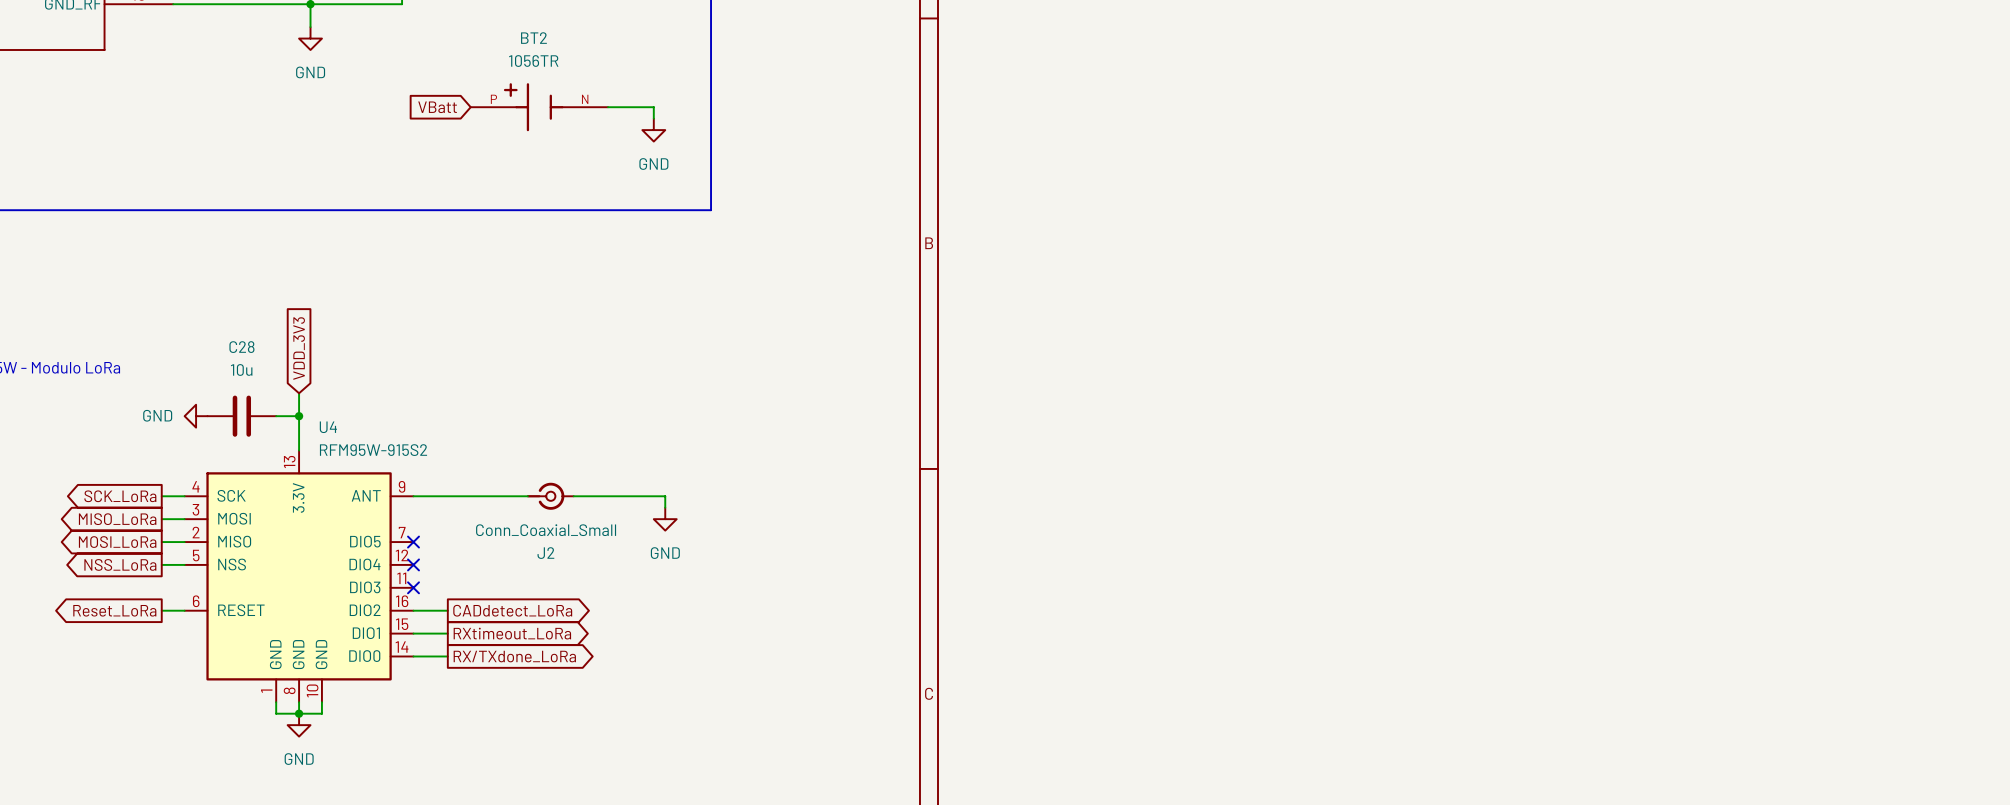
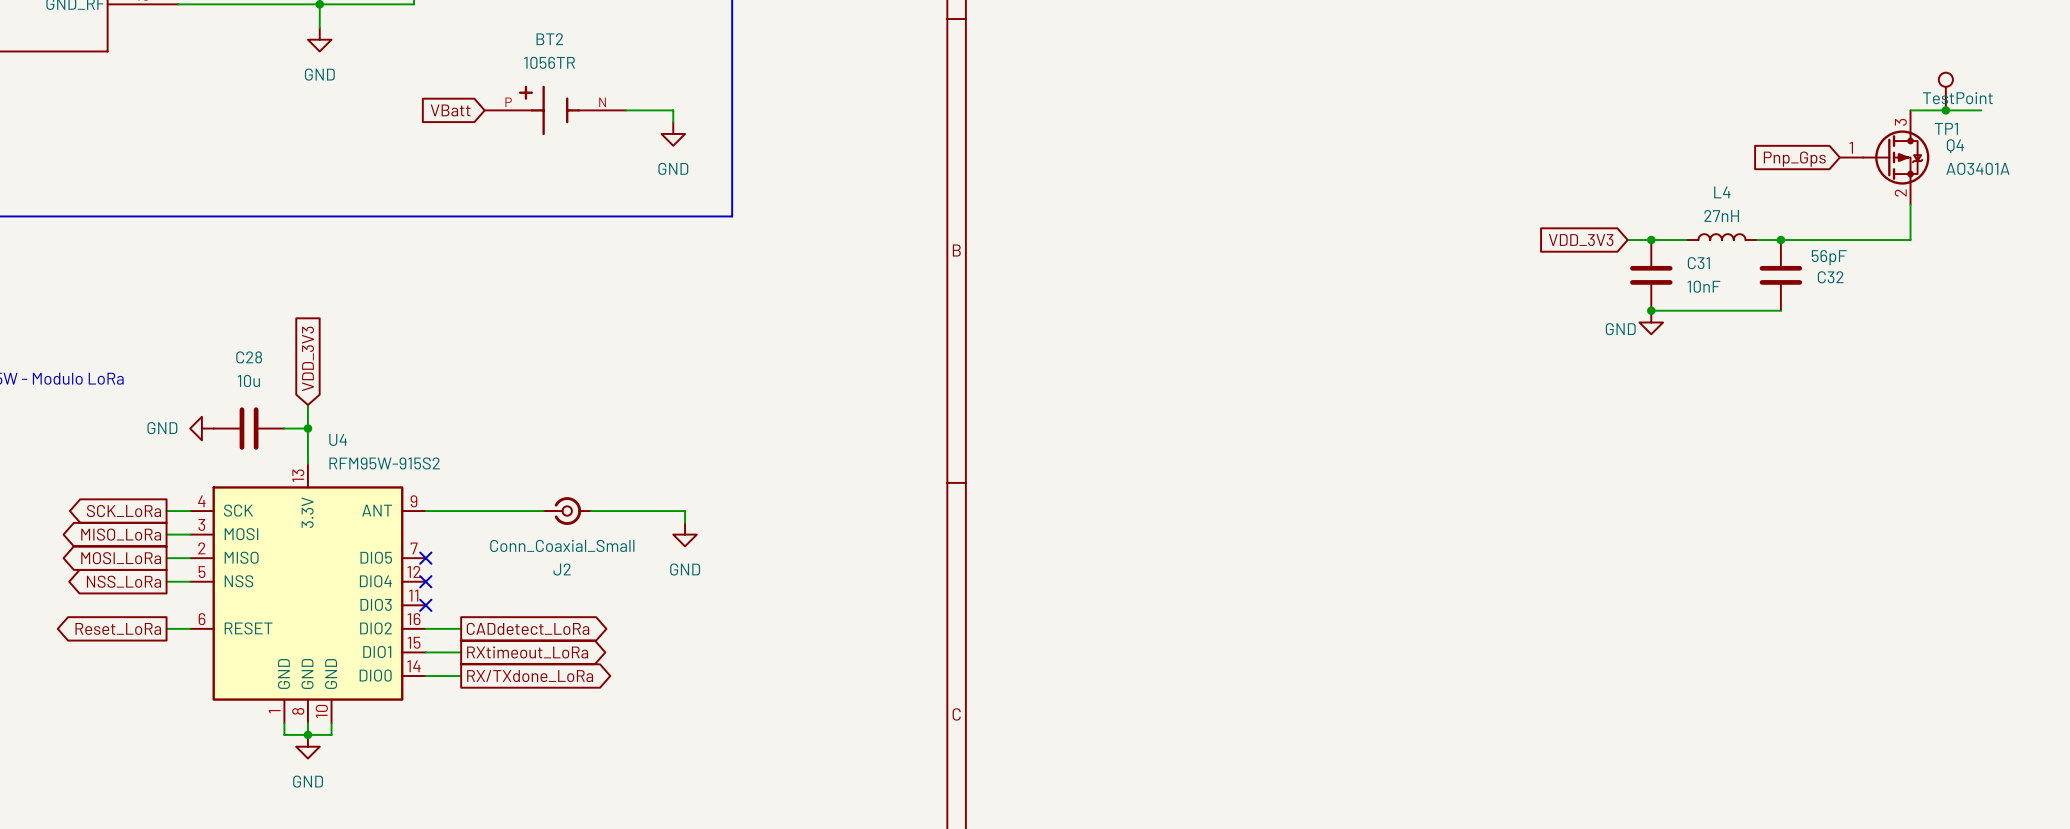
TP1: none -> TestPoint (1945, 91)
wire: none -> (1910, 110) (1981, 110)
junction: none -> (1945, 110)
Q4: none -> AO3401A (1884, 157)
global label: none -> Pnp_Gps (1794, 159)
wire: none -> (1910, 204) (1910, 240) (1757, 240)
L4: none -> 27nH (1721, 237)
global label: none -> VDD_3V3 (1581, 240)
wire: none -> (1627, 240) (1686, 240)
junction: none -> (1651, 240)
junction: none -> (1780, 240)
C31: none -> 10nF (1651, 275)
C32: none -> 56pF (1780, 275)
wire: none -> (1651, 310) (1780, 310)
junction: none -> (1651, 310)
power symbol: none -> GND (1651, 322)

